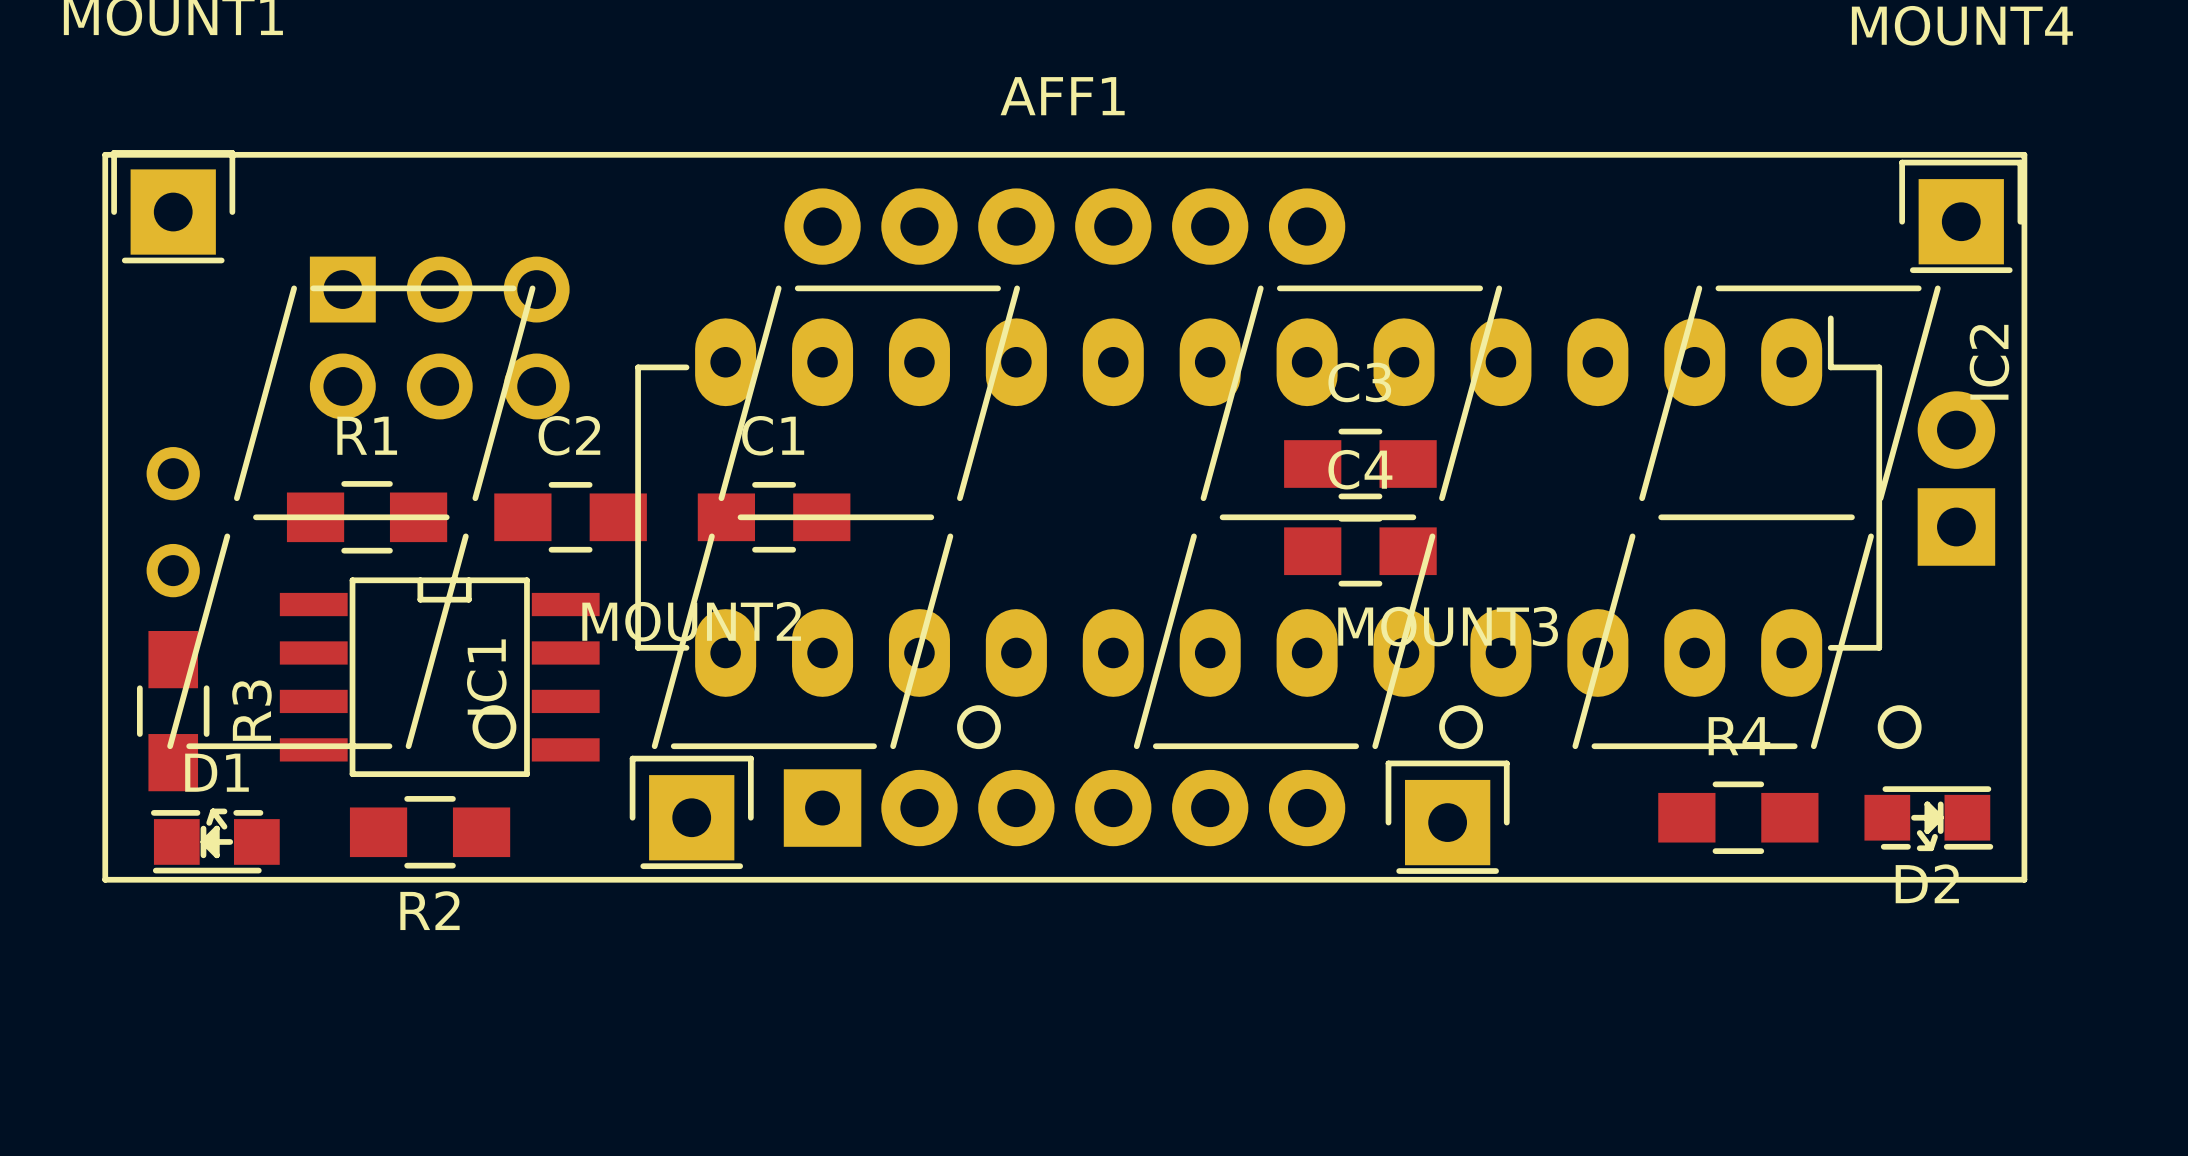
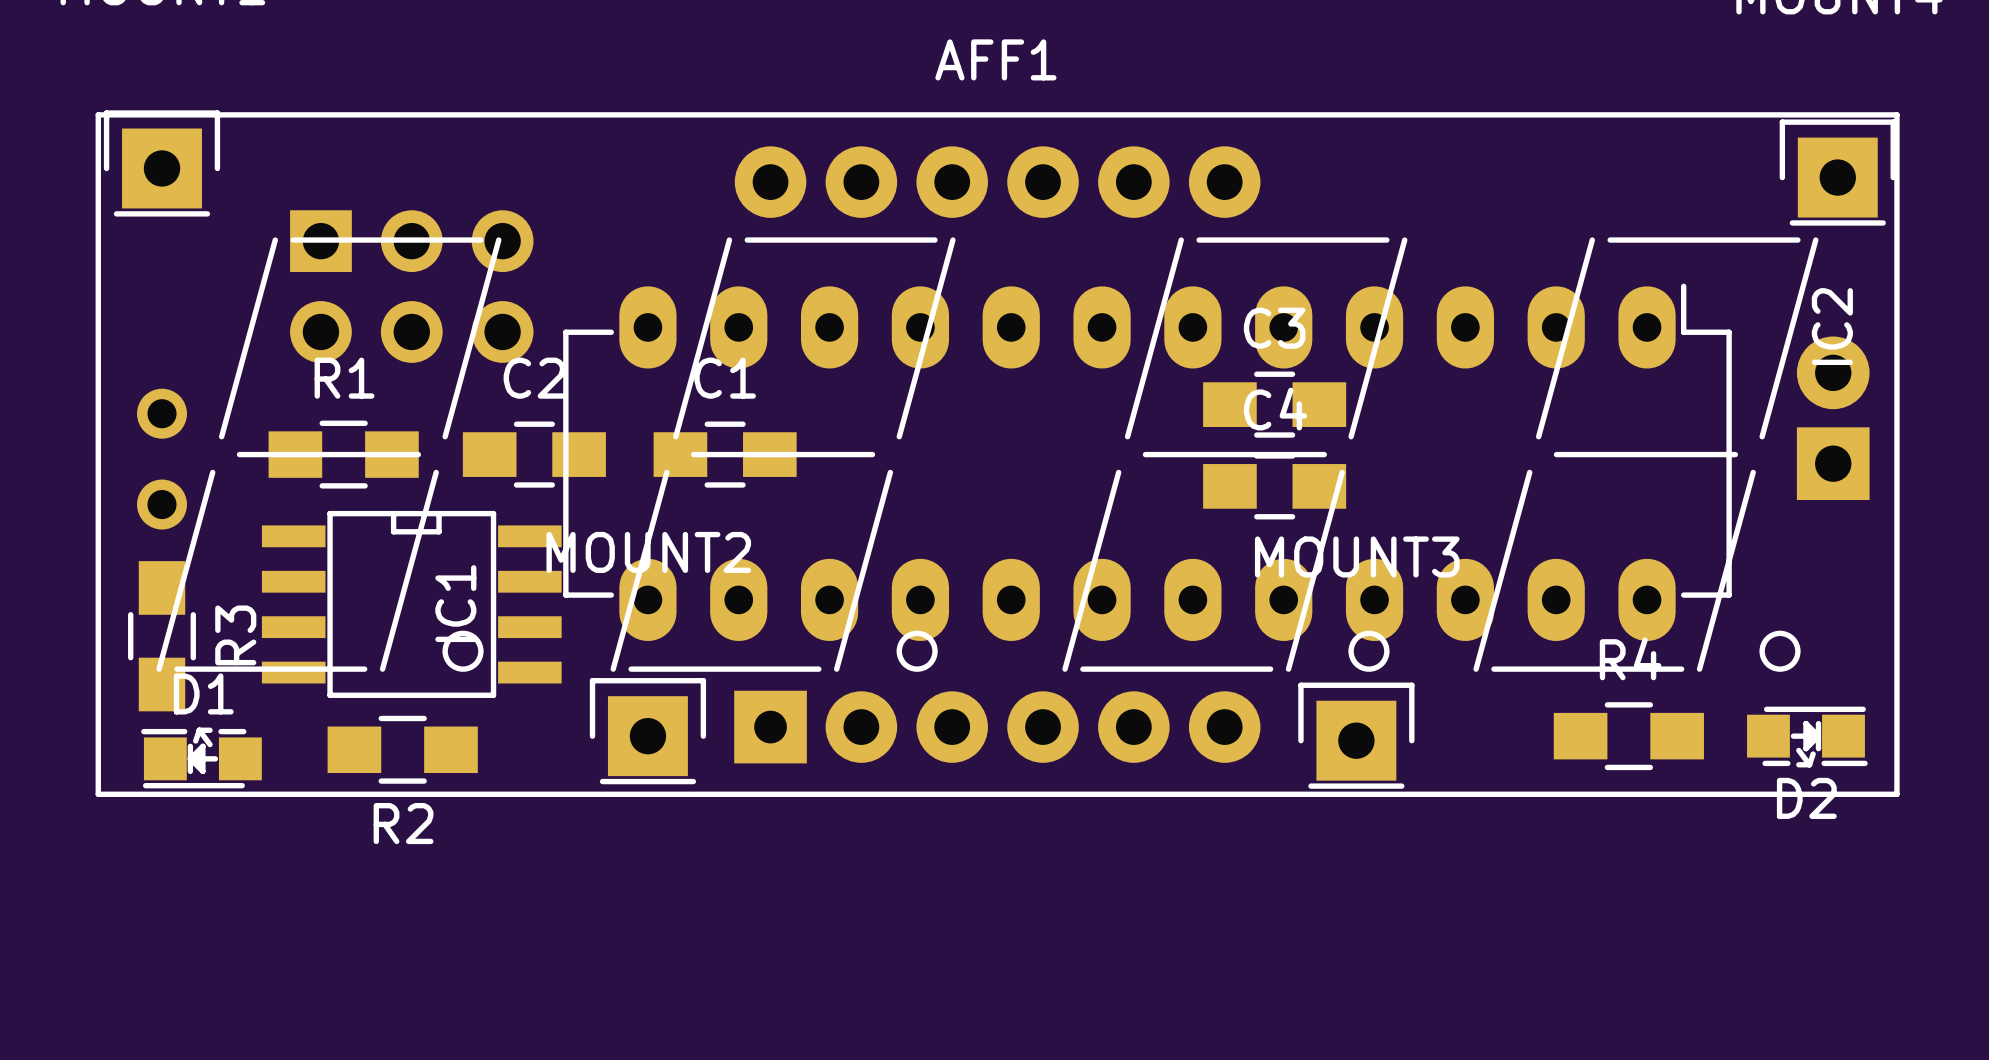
IC2 position: (1258, 506) -> (1147, 462)

